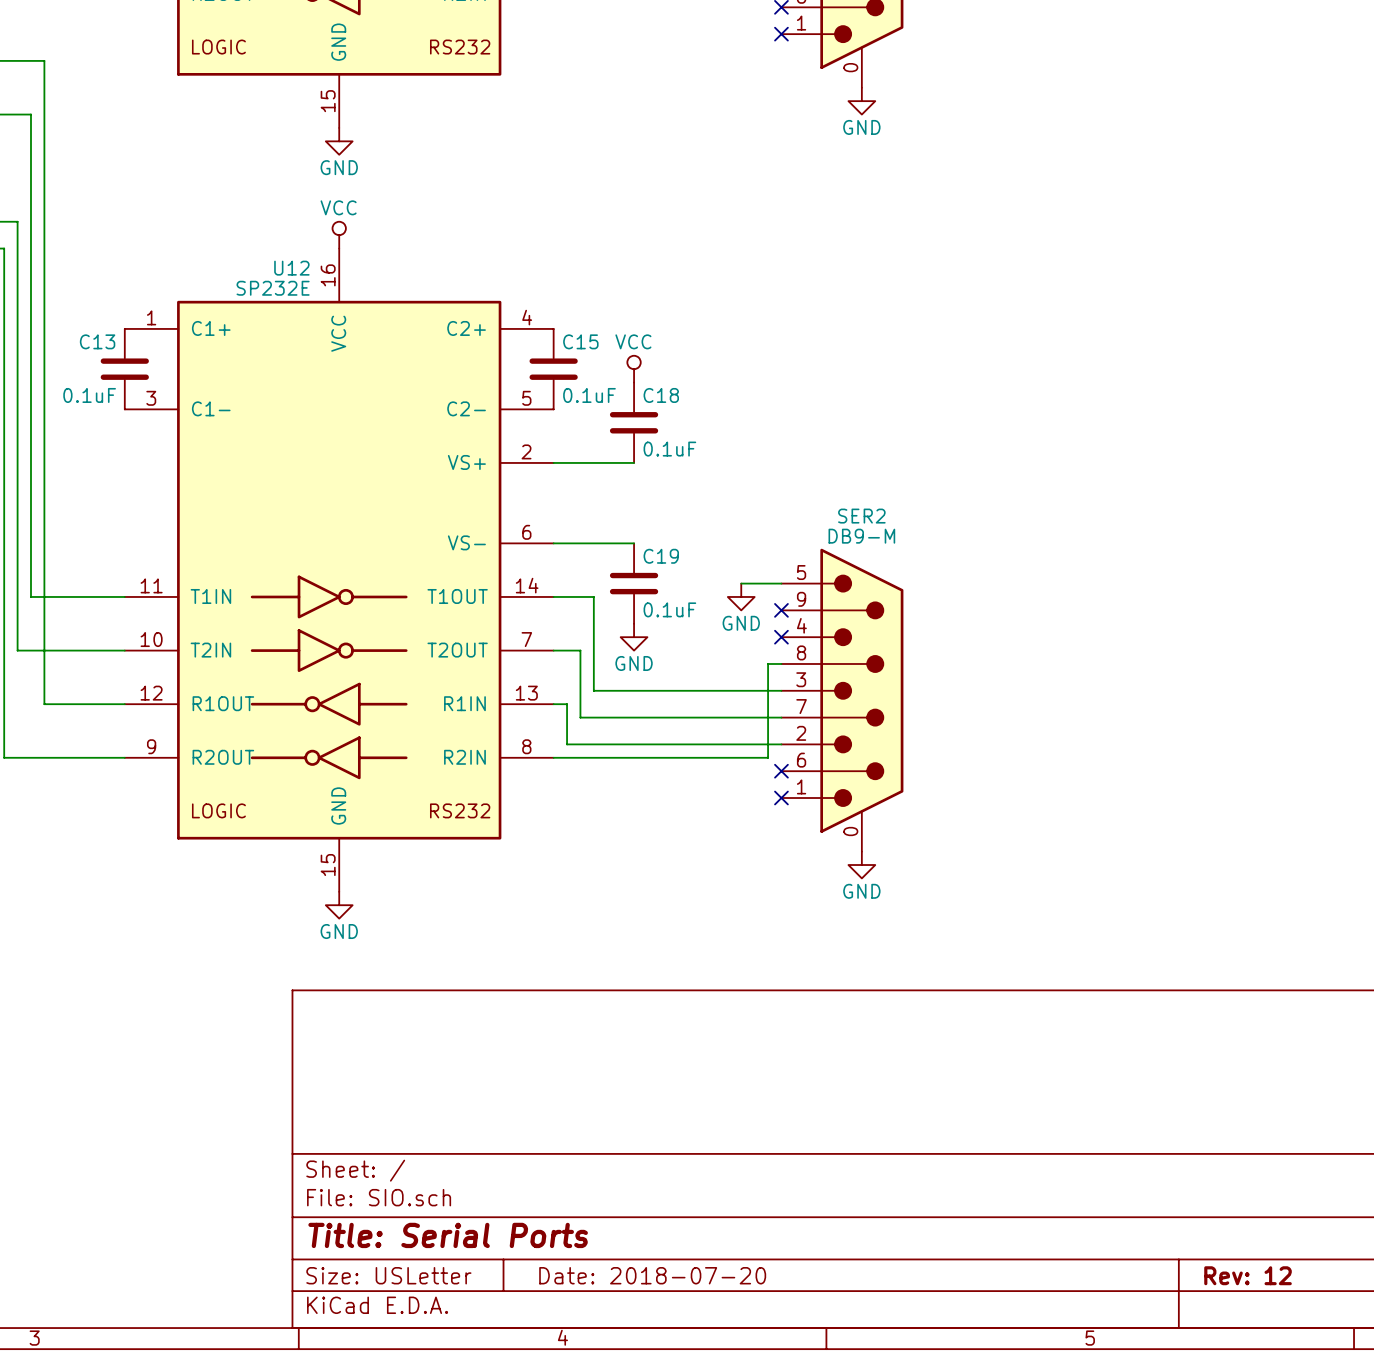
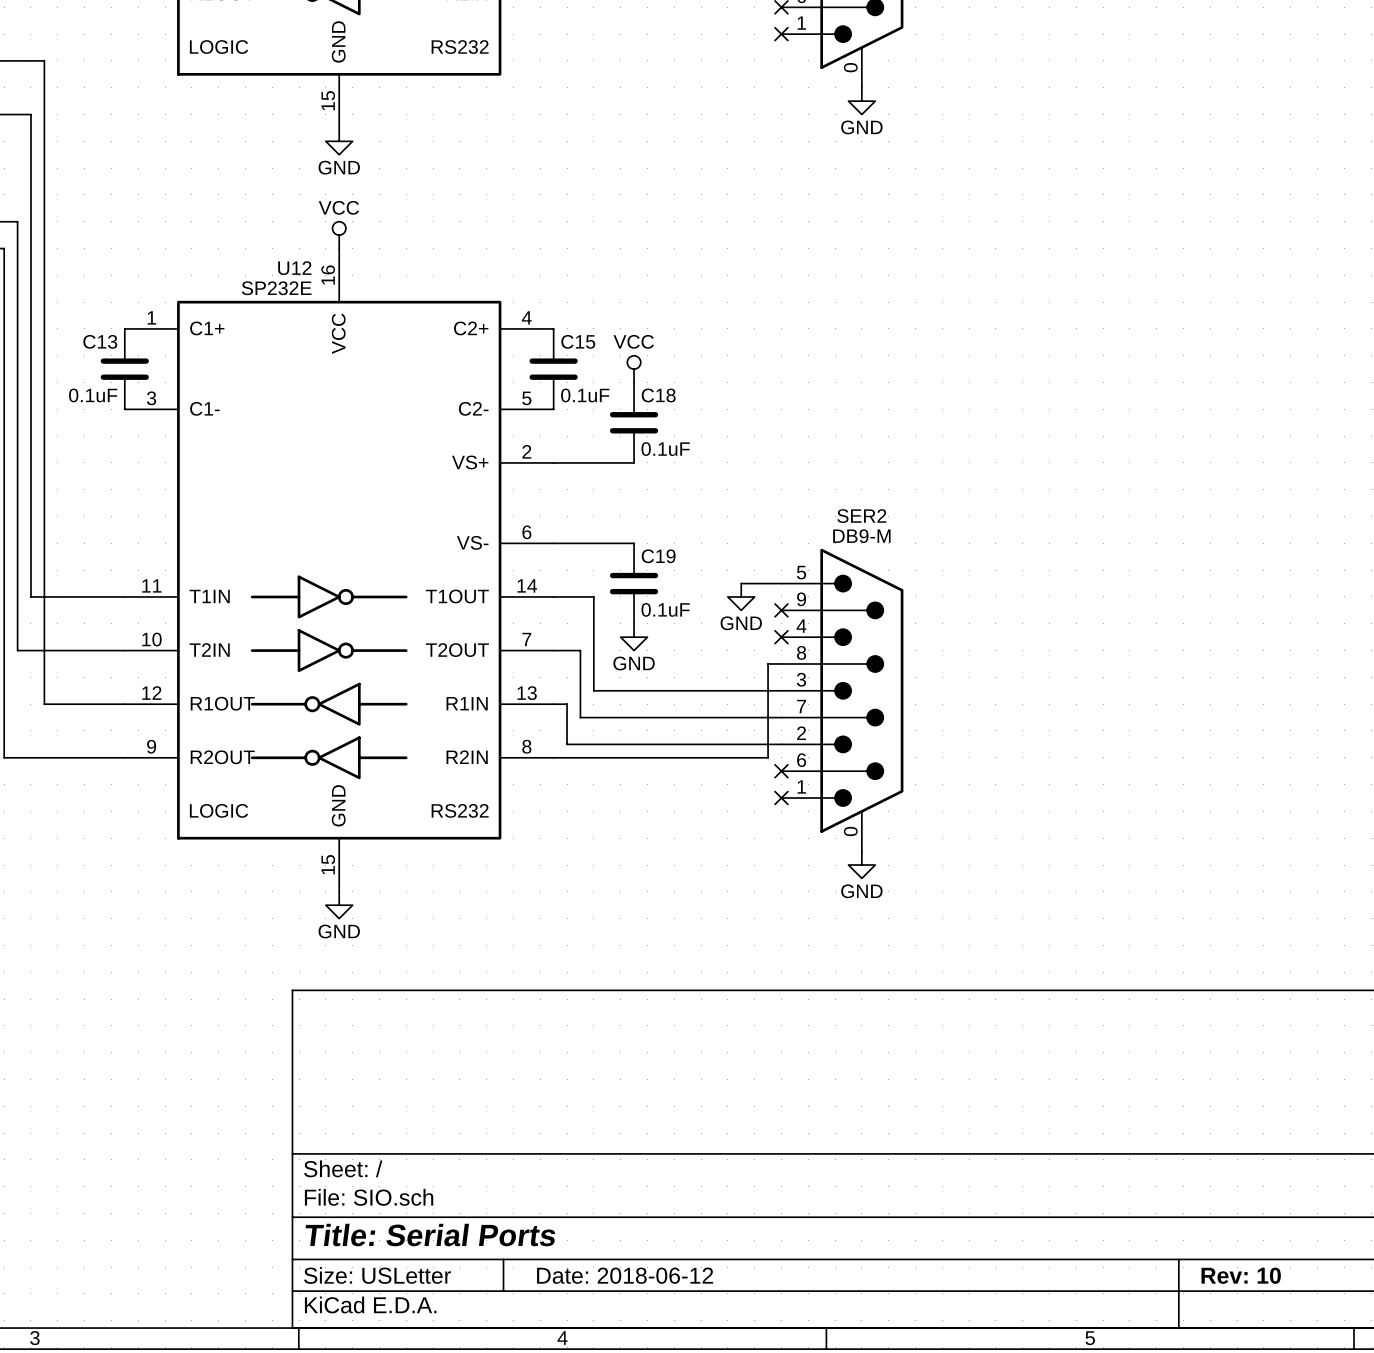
title block: Date: 2018-07-20 (652, 1275) -> Date: 2018-06-12 (625, 1275)
title block: Rev: 12 (1248, 1275) -> Rev: 10 (1241, 1275)

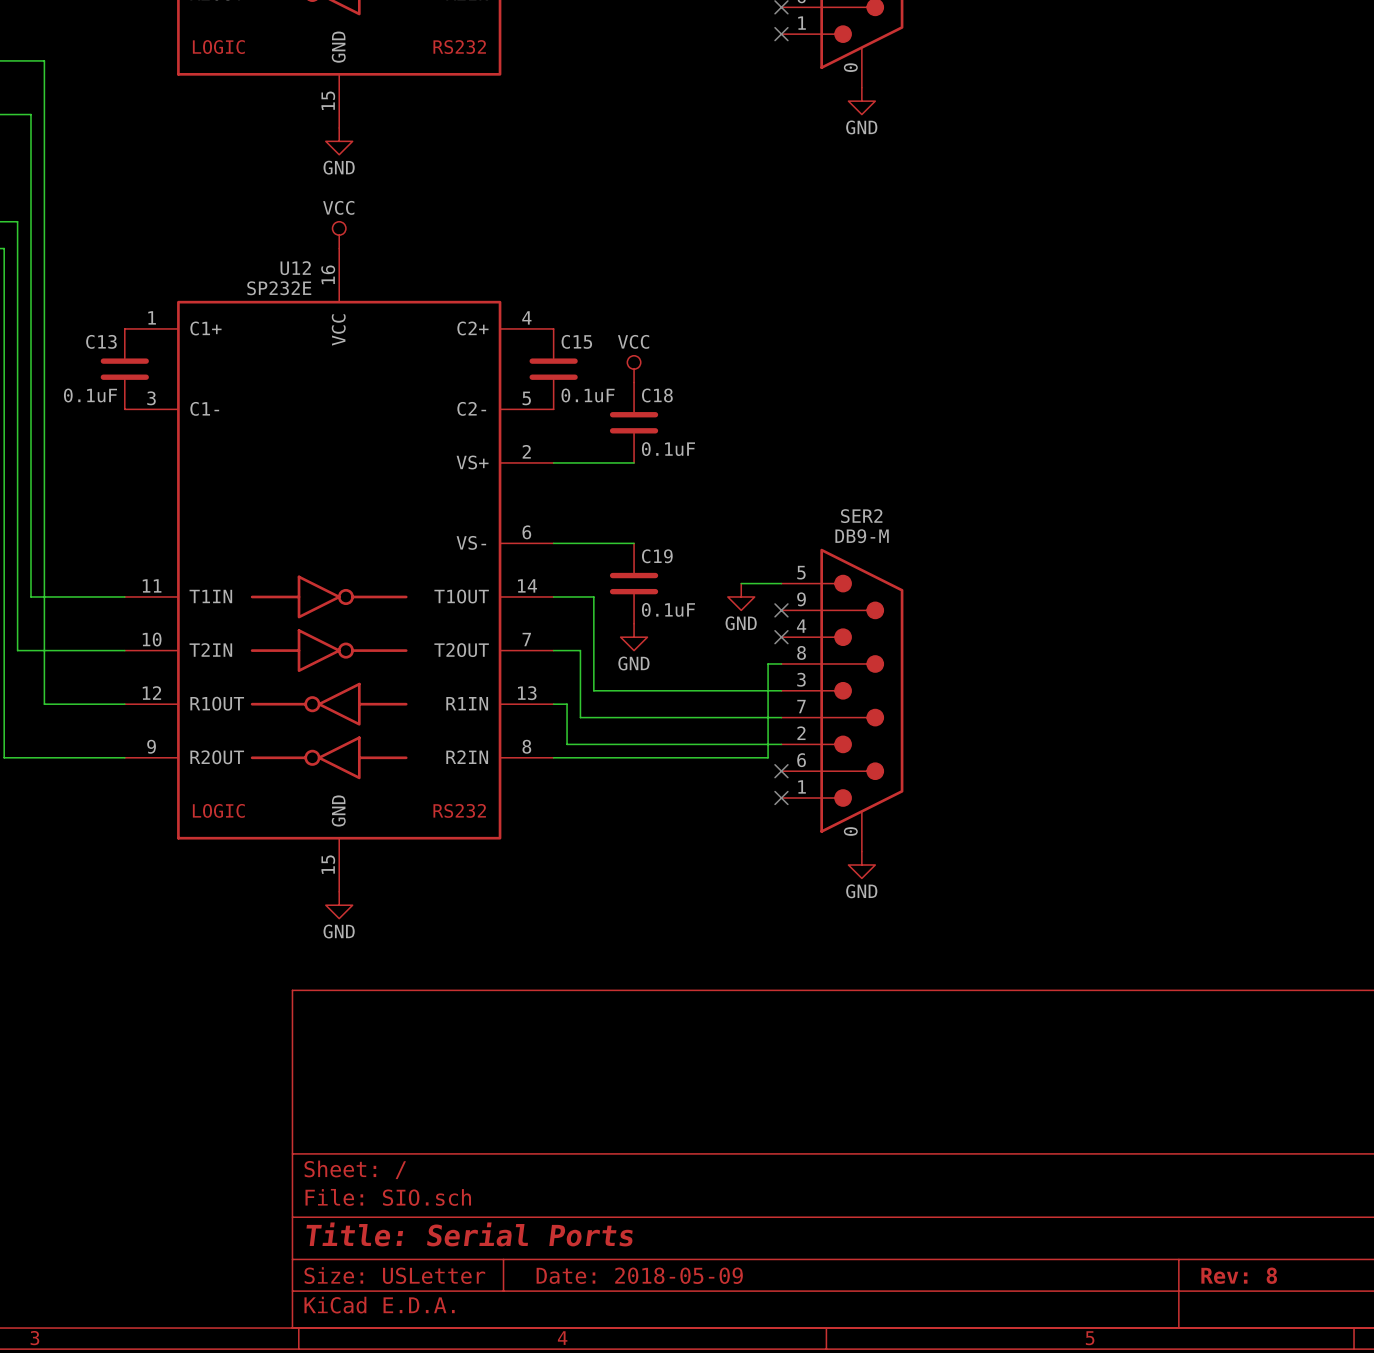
title block: Date: 2018-06-12 (625, 1275) -> Date: 2018-05-09 (639, 1275)
title block: Rev: 10 (1241, 1275) -> Rev: 8 (1239, 1275)

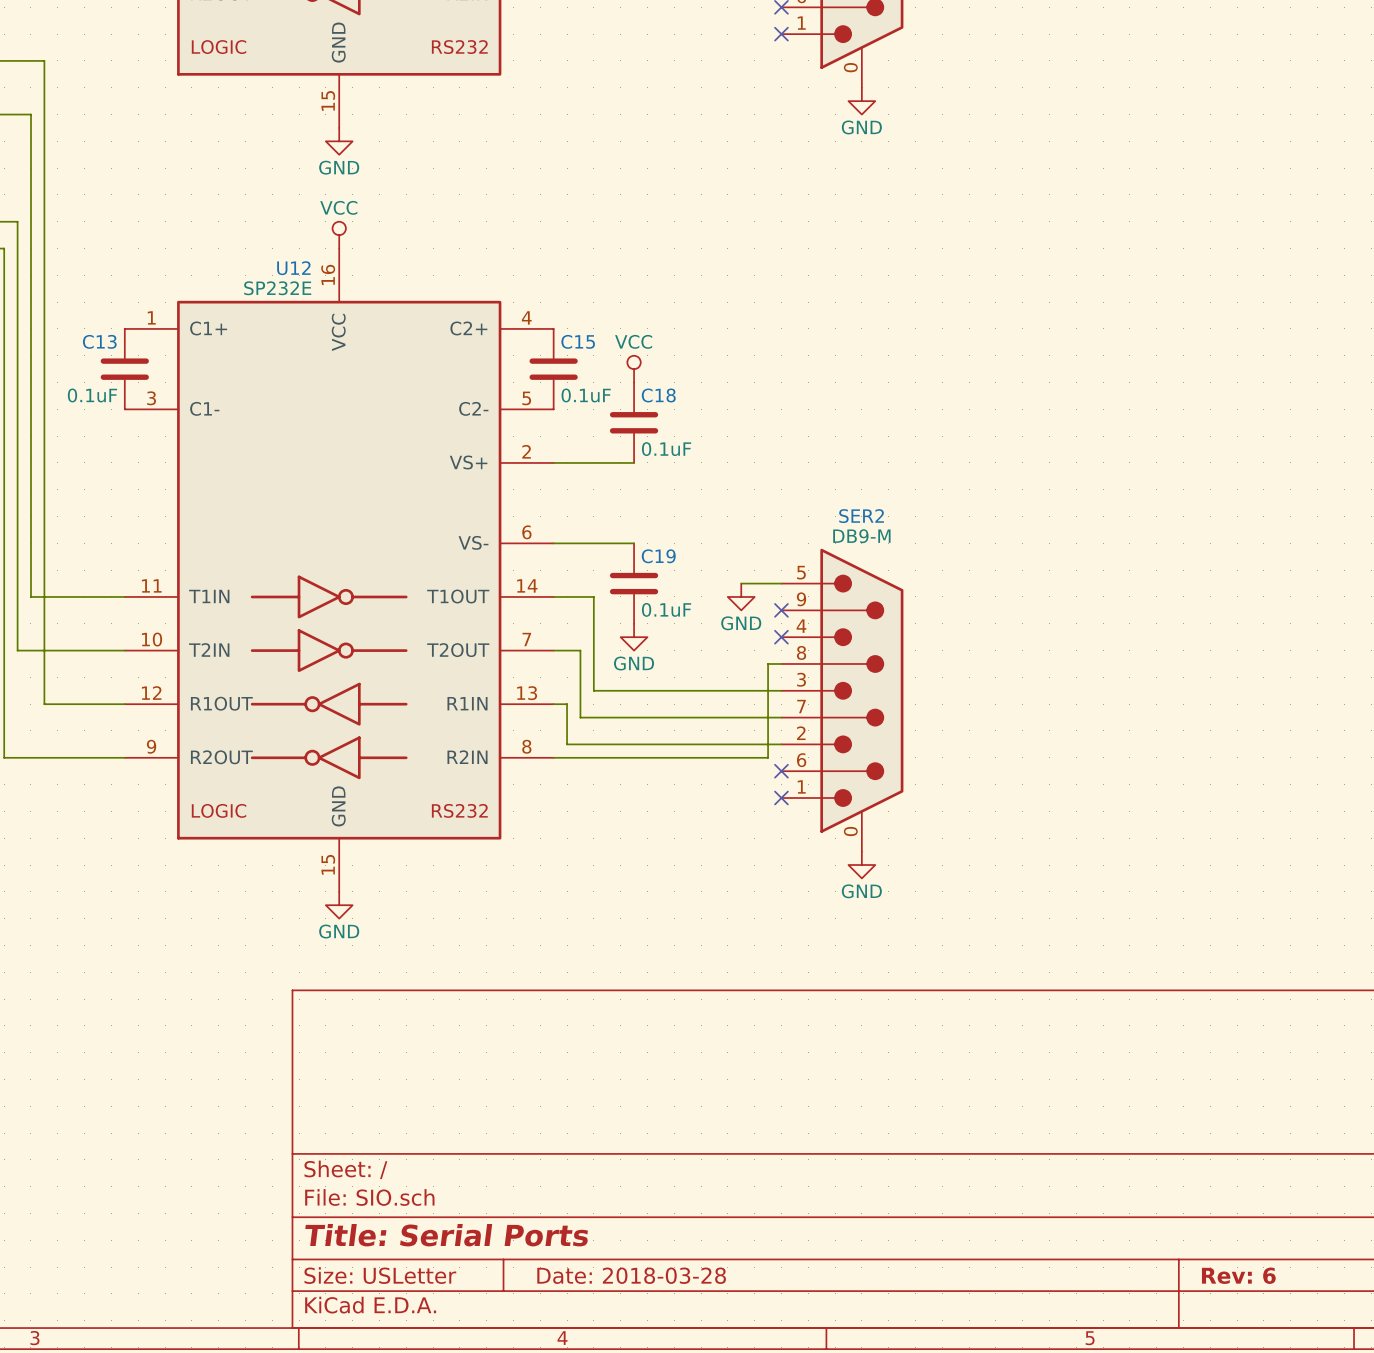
title block: Date: 2018-05-09 (639, 1275) -> Date: 2018-03-28 (631, 1275)
title block: Rev: 8 (1239, 1275) -> Rev: 6 (1238, 1275)

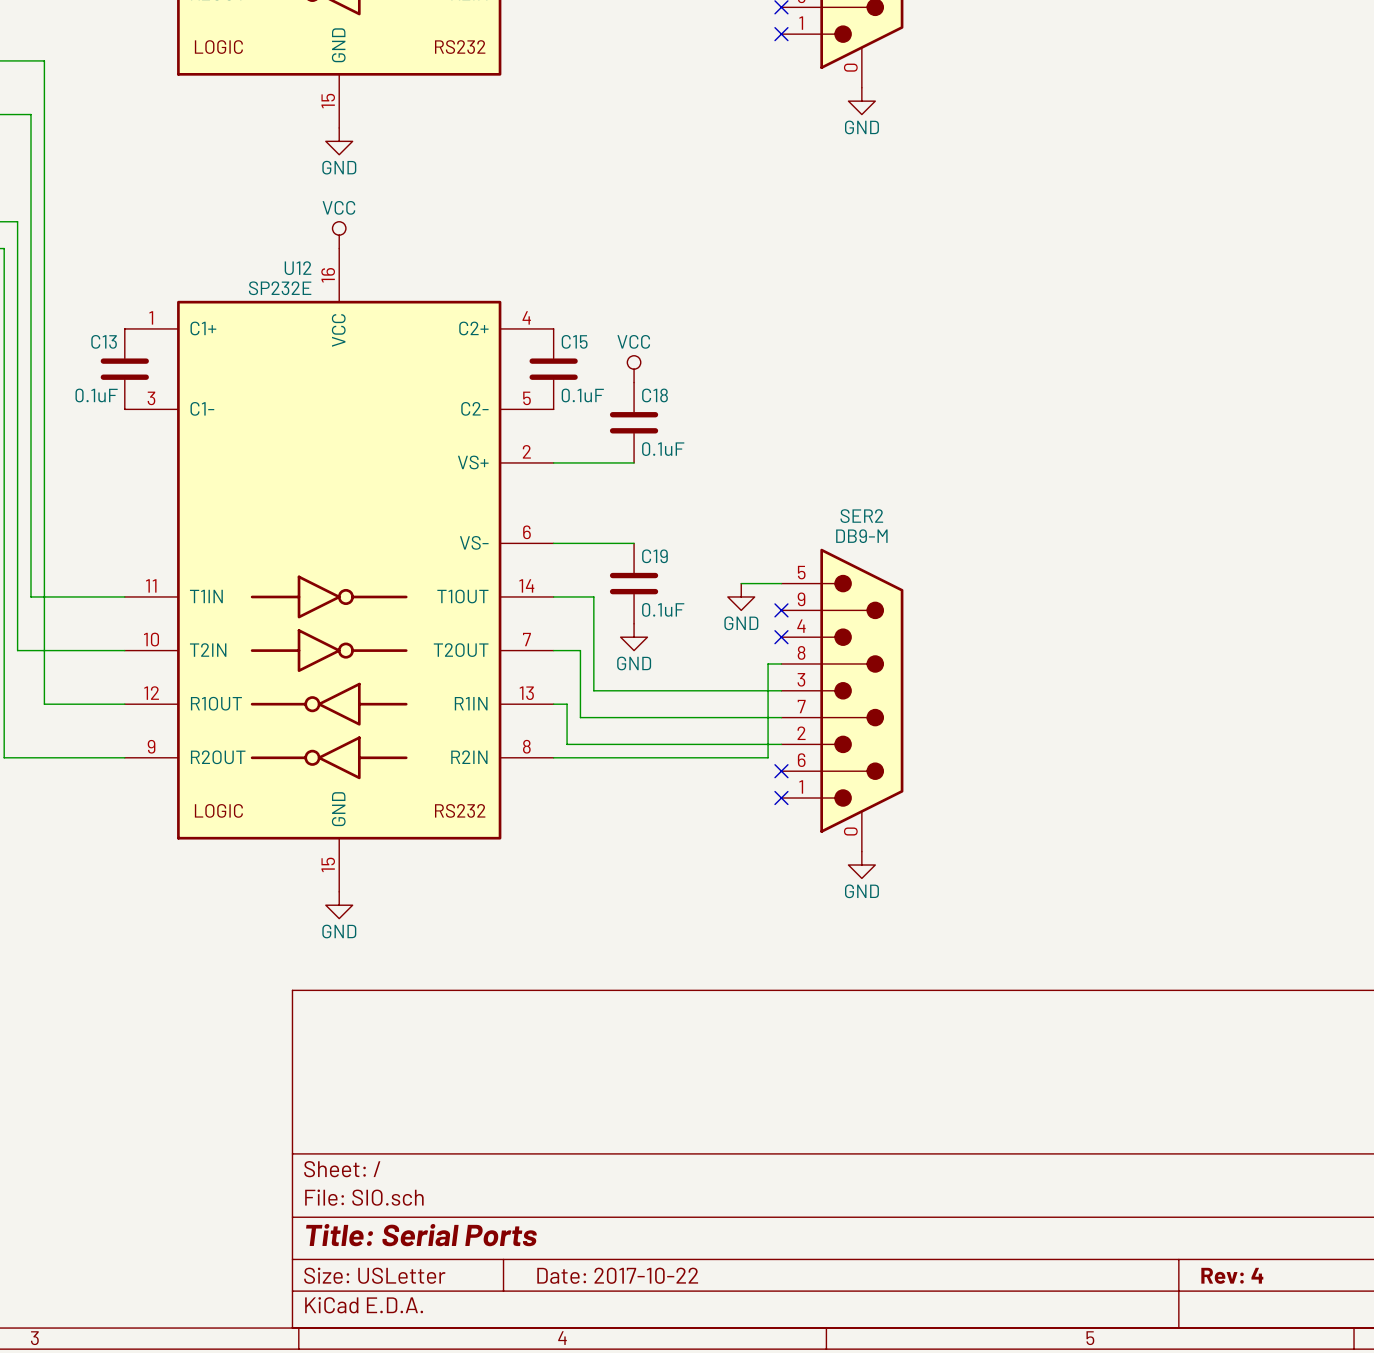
title block: Date: 2018-03-28 (631, 1275) -> Date: 2017-10-22 (617, 1275)
title block: Rev: 6 (1238, 1275) -> Rev: 4 (1232, 1275)

